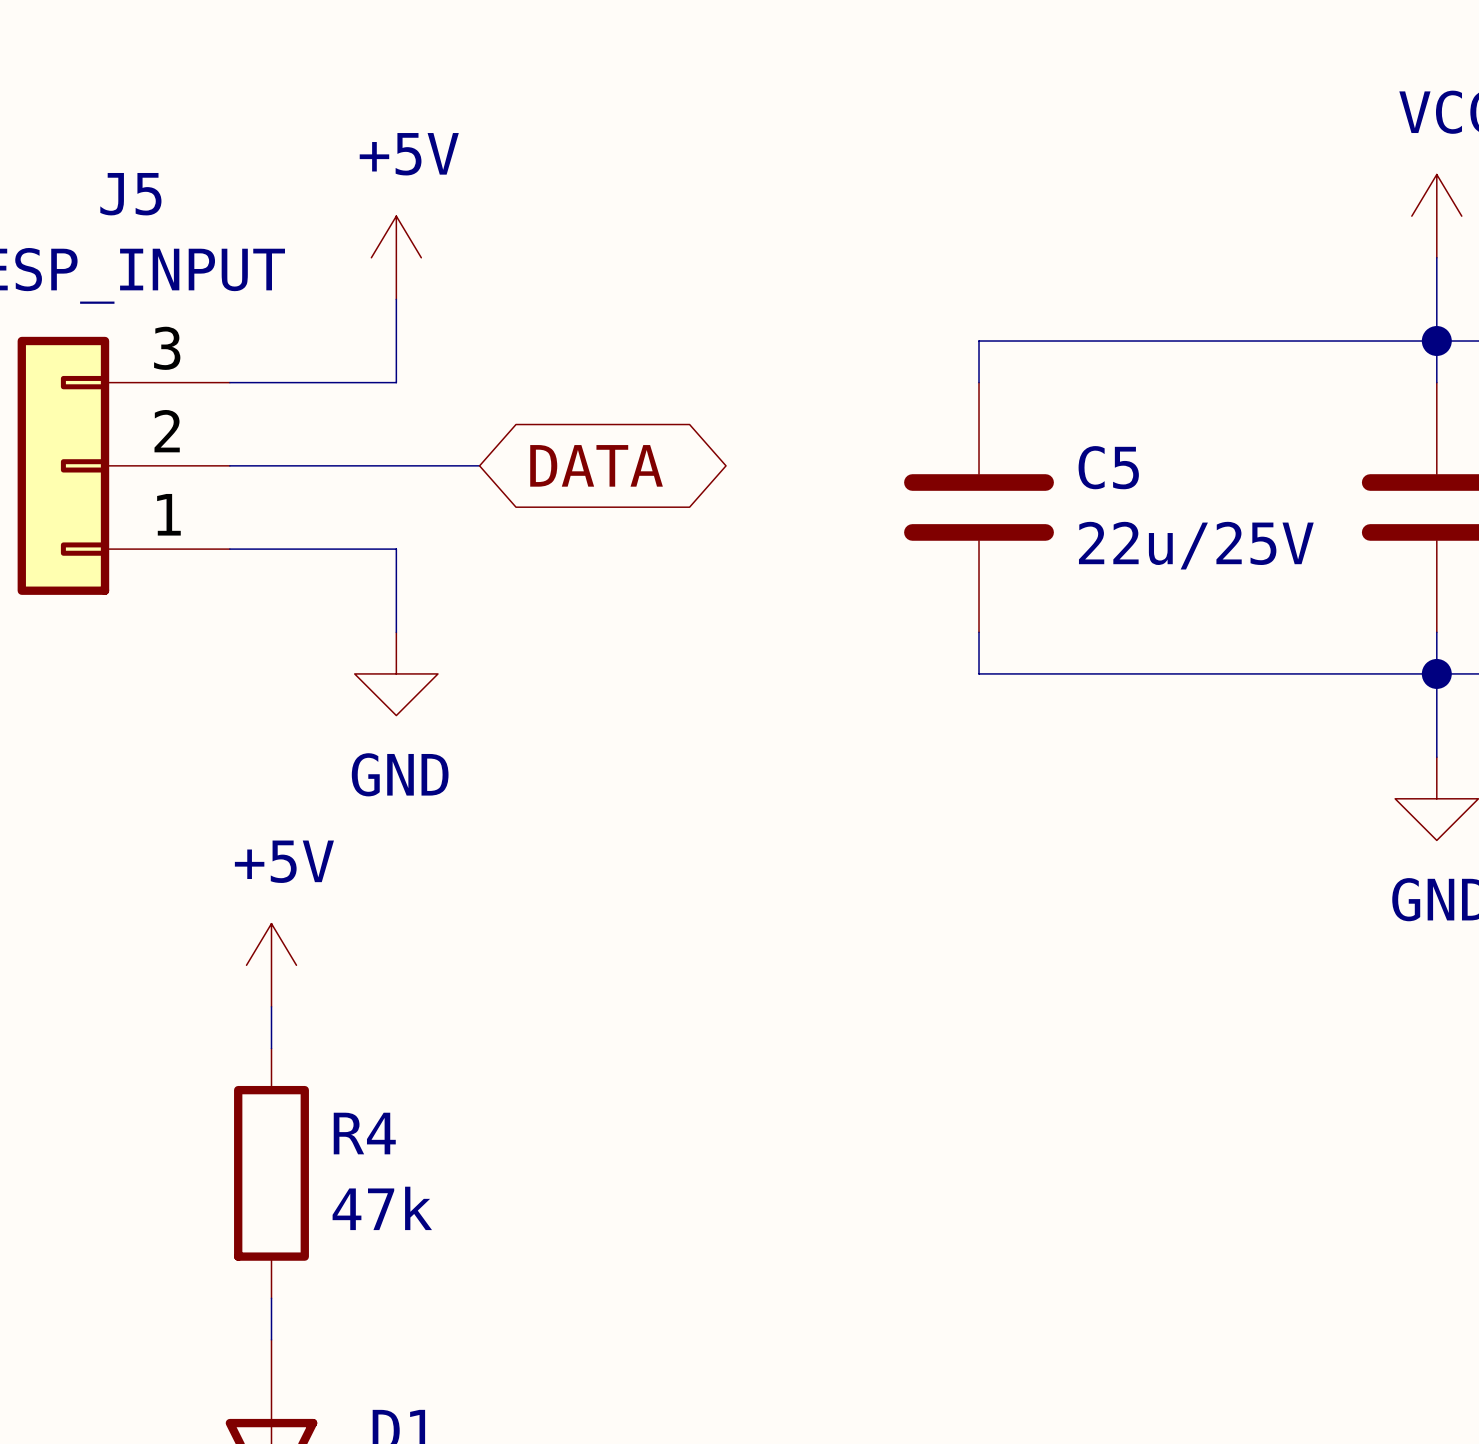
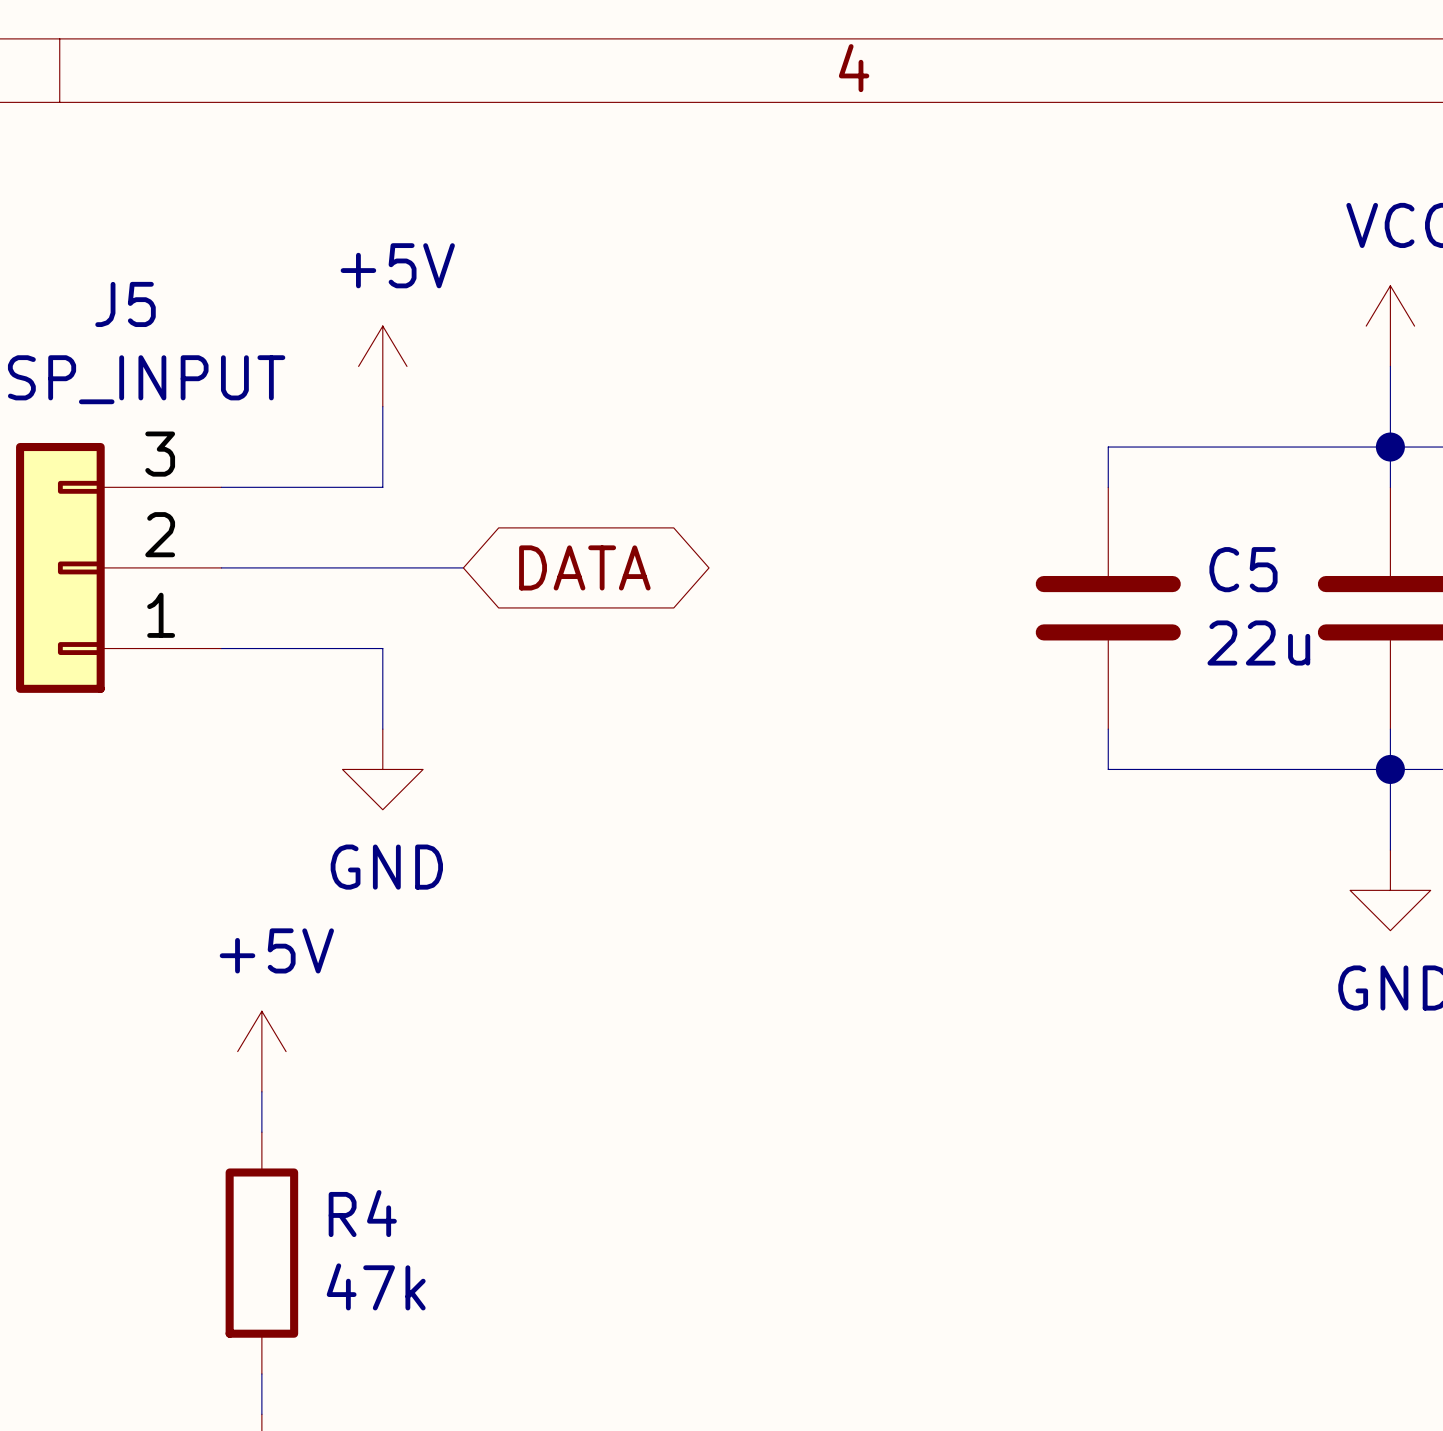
wire: (1145, 341) (979, 341) (979, 382) -> (1108, 447) (1108, 487)
C5 position: (979, 507) -> (1108, 608)
C5 value: 22u/25V (1196, 545) -> 22u (1258, 643)
wire: (979, 632) (979, 673) (1145, 673) -> (1108, 729) (1108, 769)

